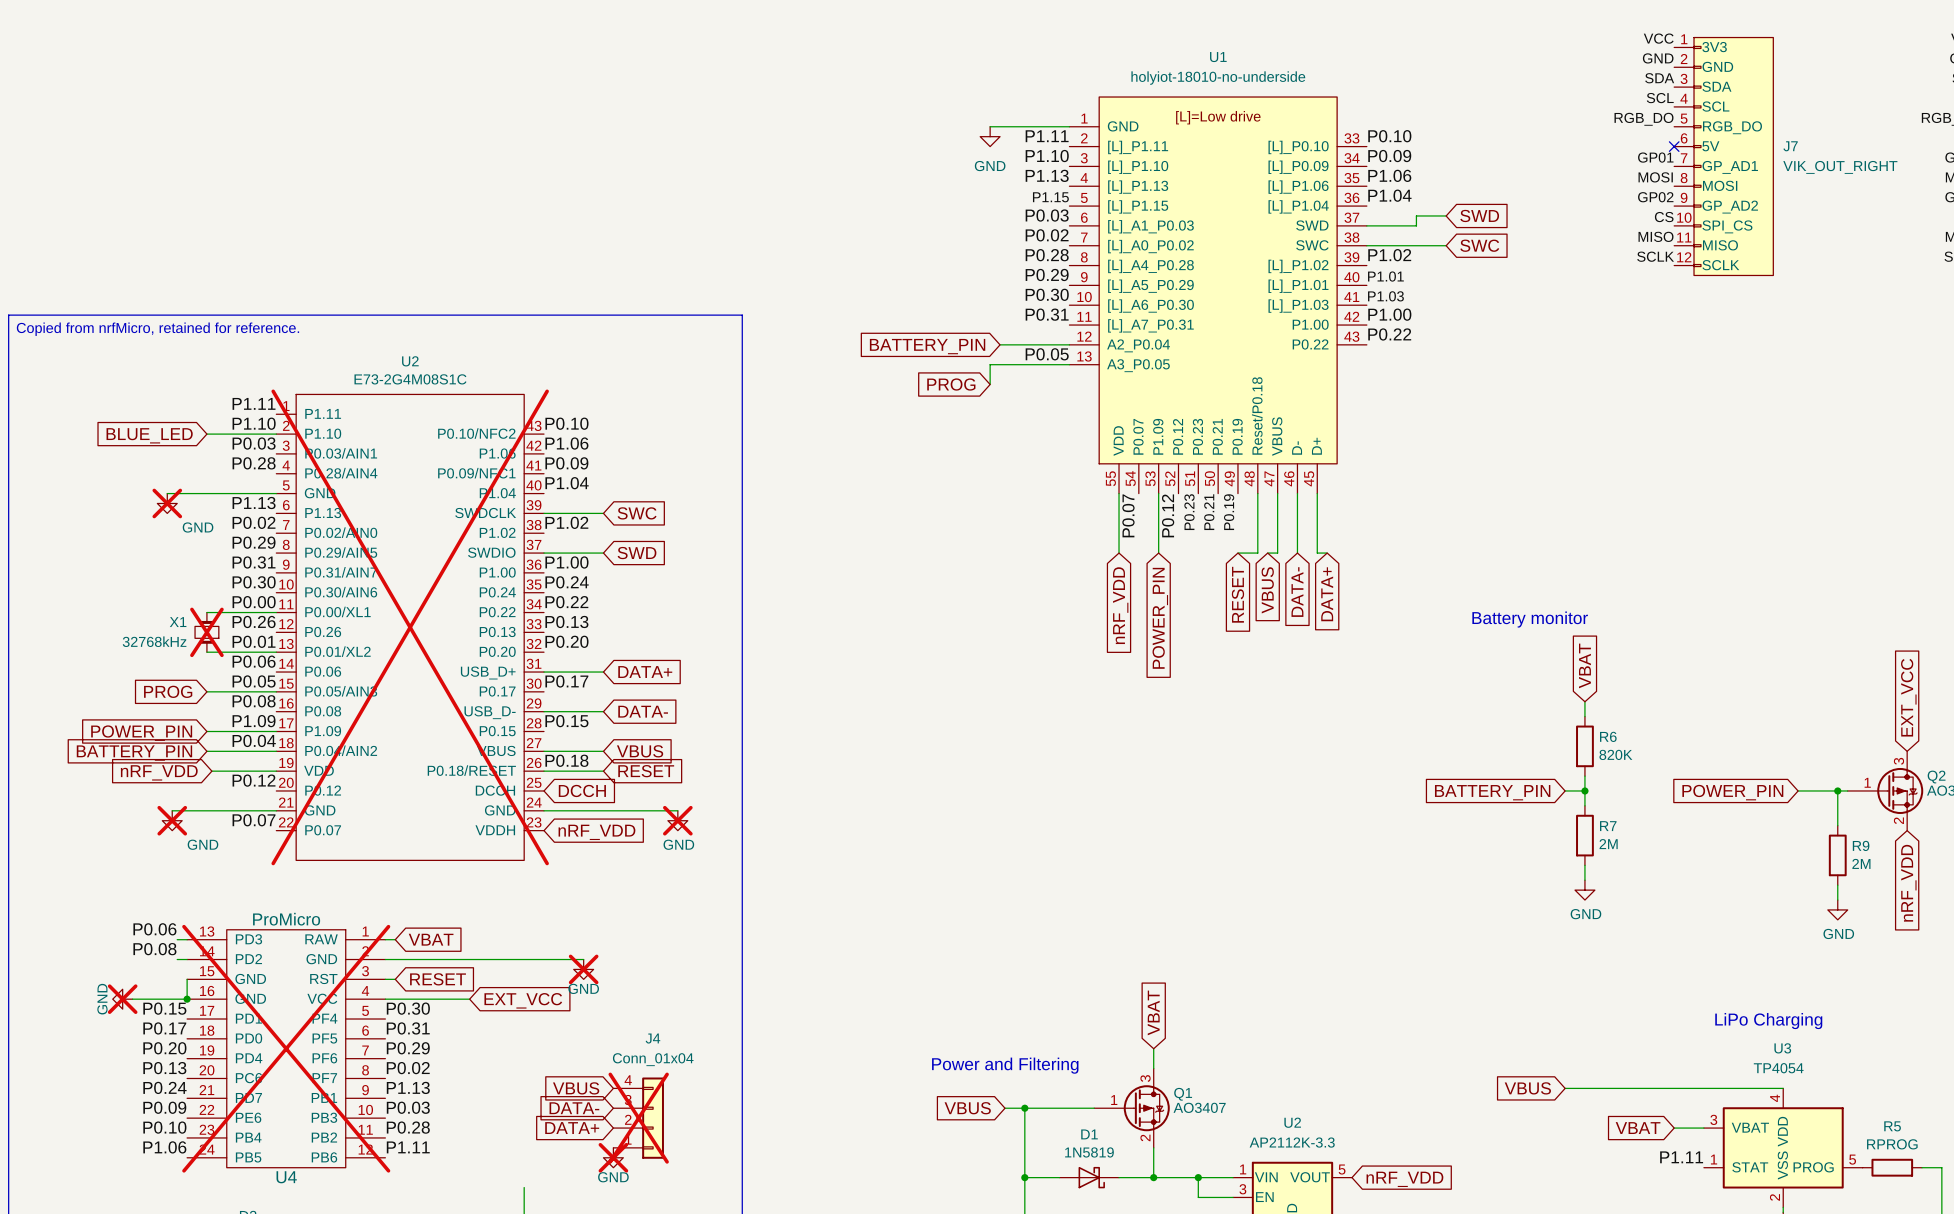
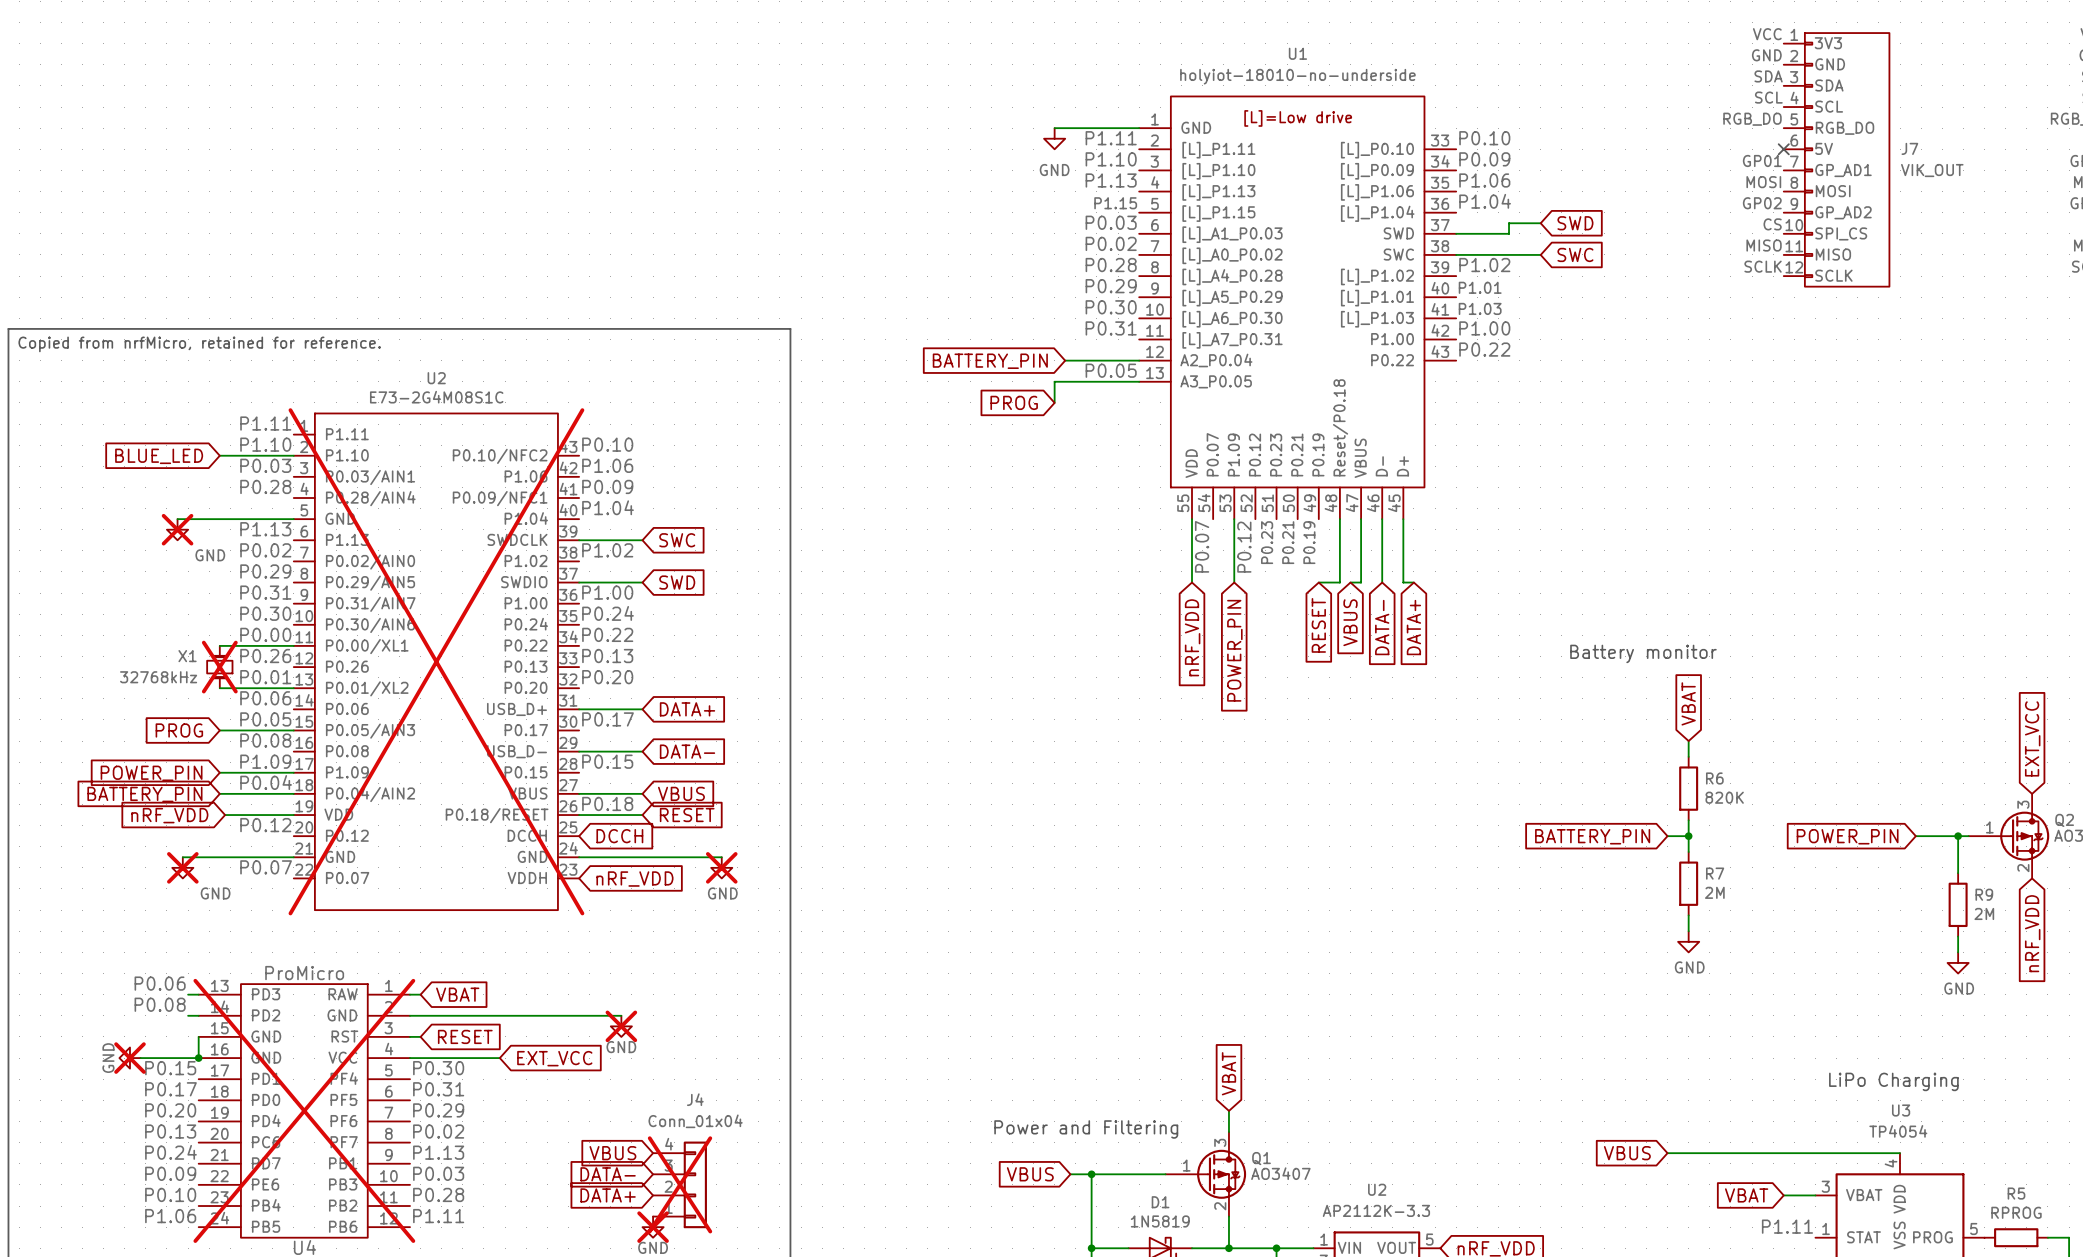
J7 value: VIK_OUT_RIGHT (1840, 167) -> VIK_OUT (1932, 170)

